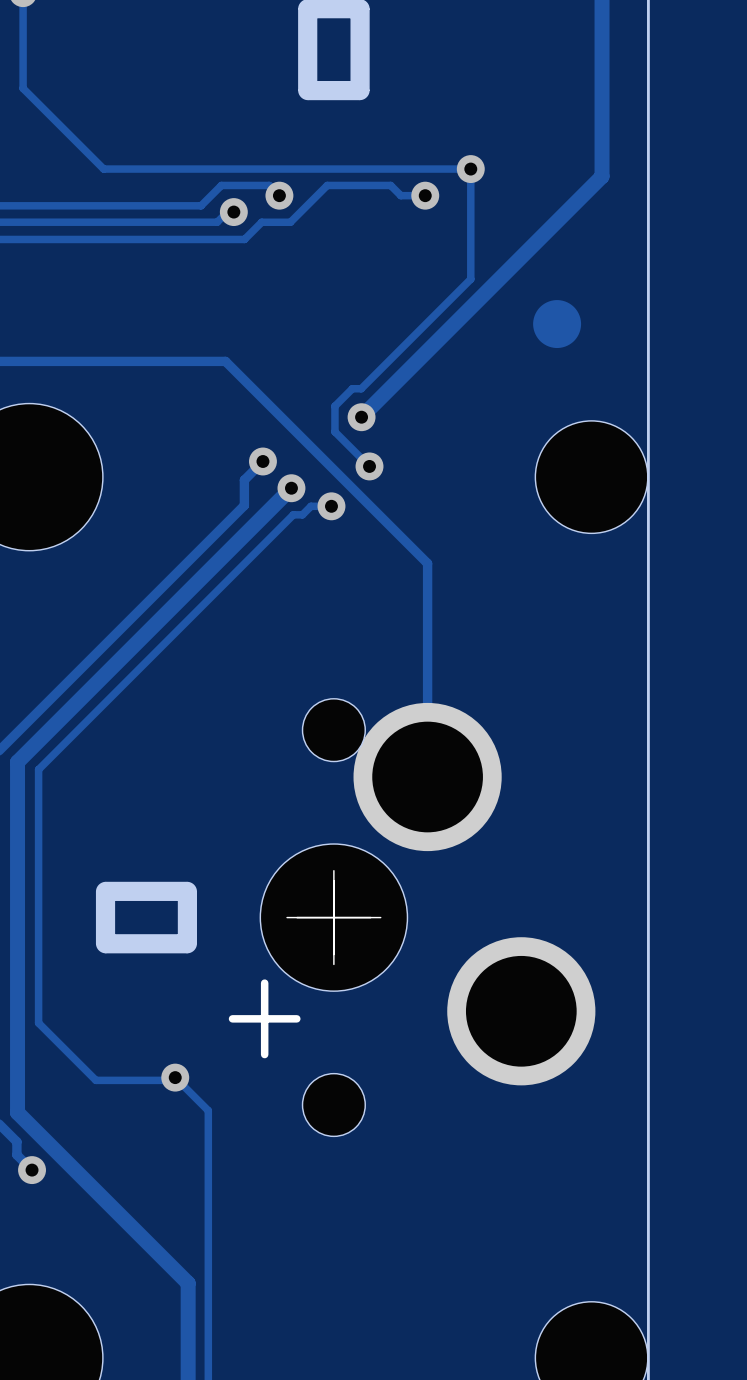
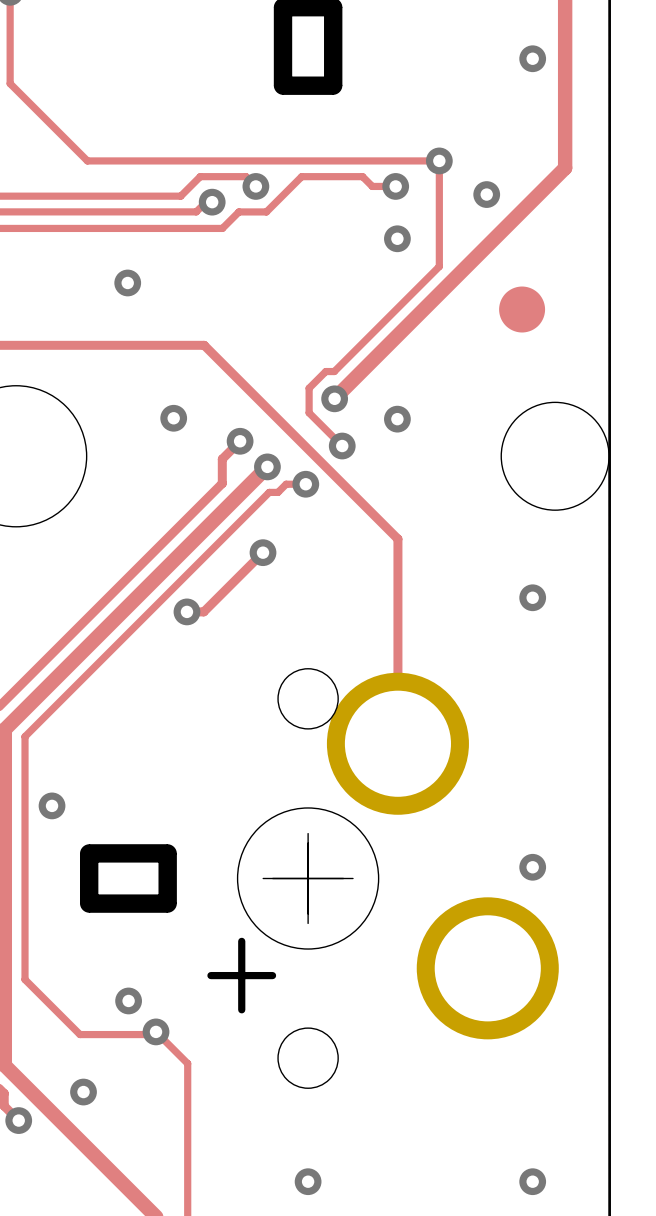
via: none -> (532, 58)
via: none -> (486, 194)
via: none -> (397, 238)
via: none -> (127, 282)
via: none -> (173, 418)
via: none -> (397, 419)
track: none -> (263, 552) (203, 611) (186, 611)
via: none -> (263, 552)
via: none -> (532, 597)
via: none -> (186, 611)
via: none -> (52, 805)
via: none -> (532, 867)
via: none -> (128, 1000)
via: none -> (83, 1092)
via: none -> (308, 1181)
via: none -> (532, 1181)

